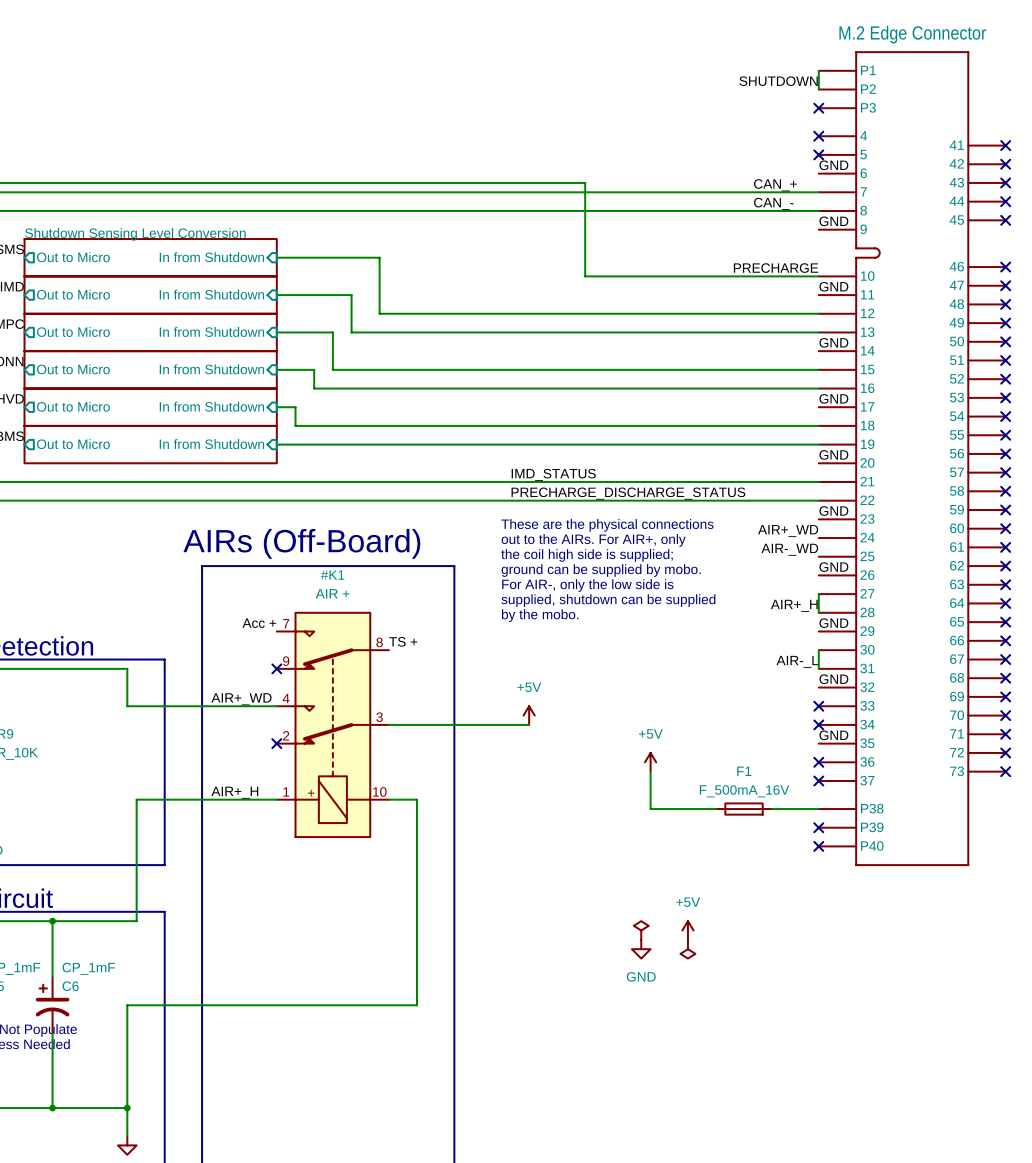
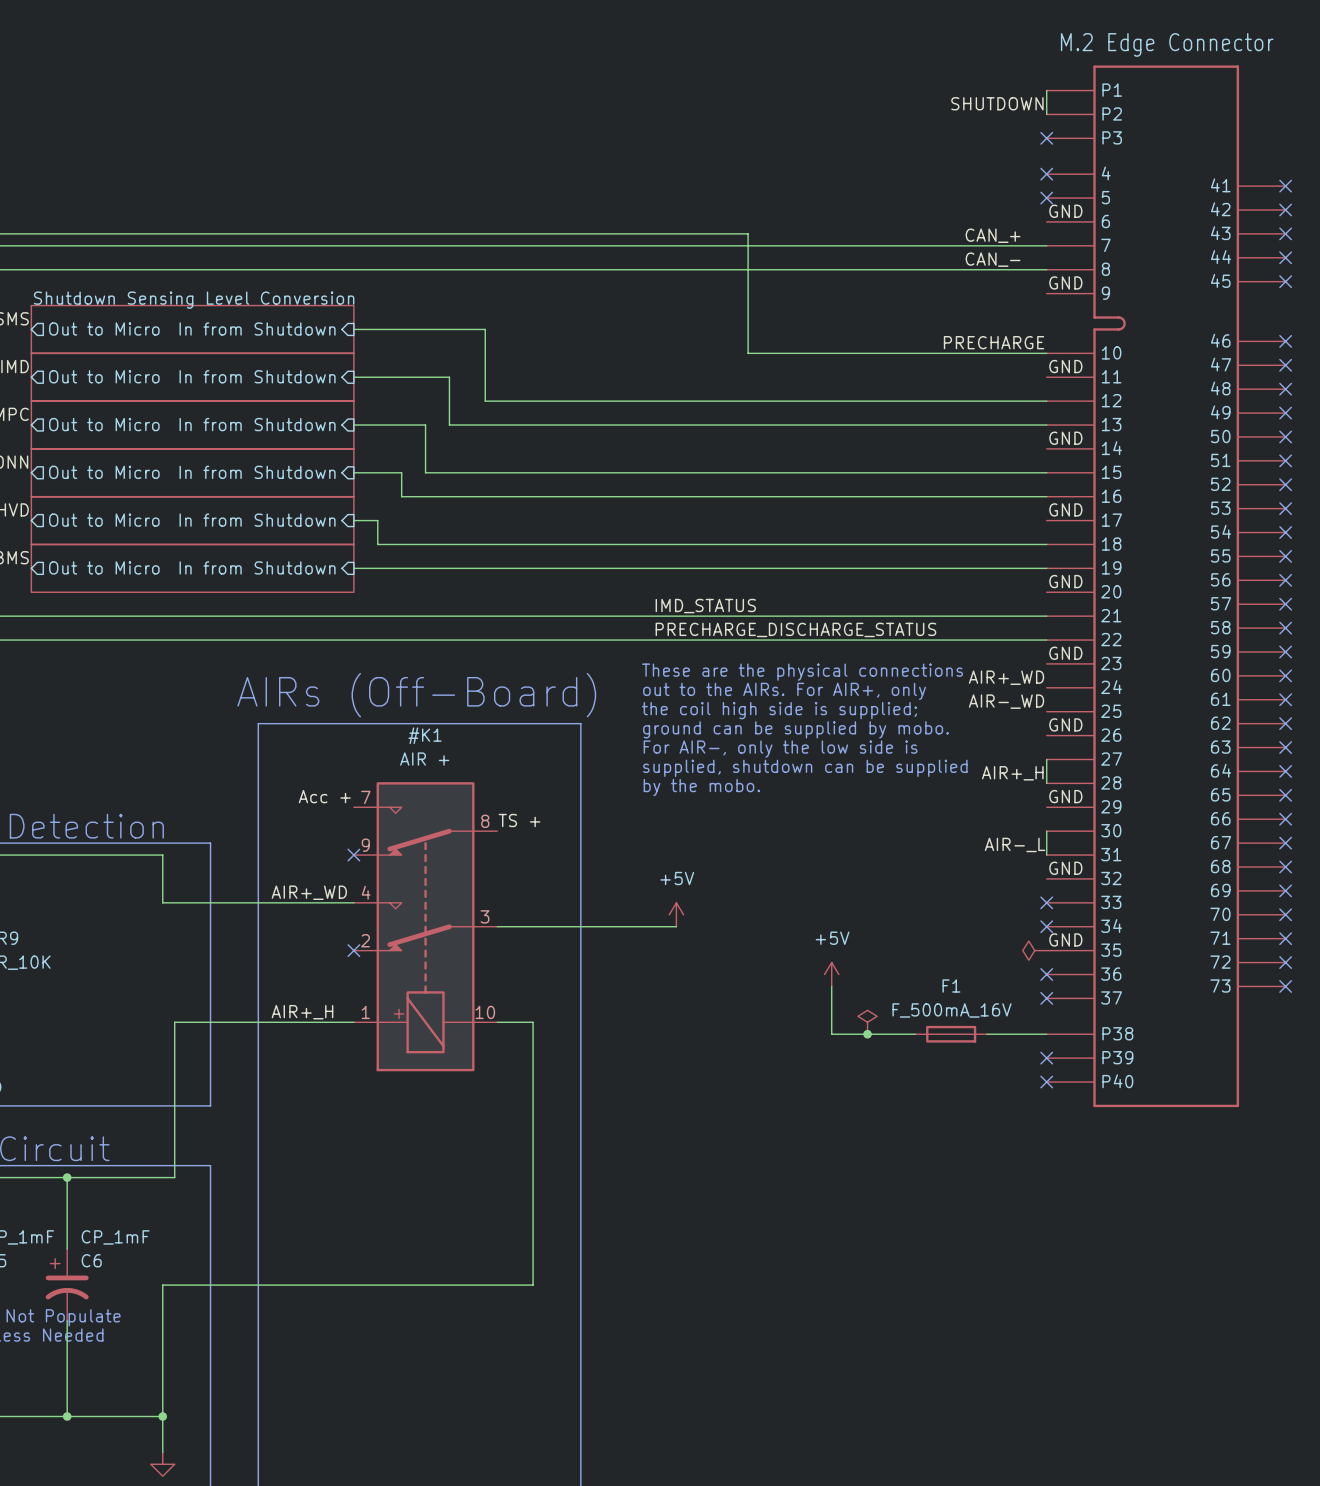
power symbol: none -> (1034, 950)
power symbol: none -> (867, 1022)
junction: none -> (867, 1034)
power symbol: (641, 930) -> none
power symbol: +5V (687, 930) -> none
power symbol: GND (641, 949) -> none
power symbol: (687, 949) -> none

